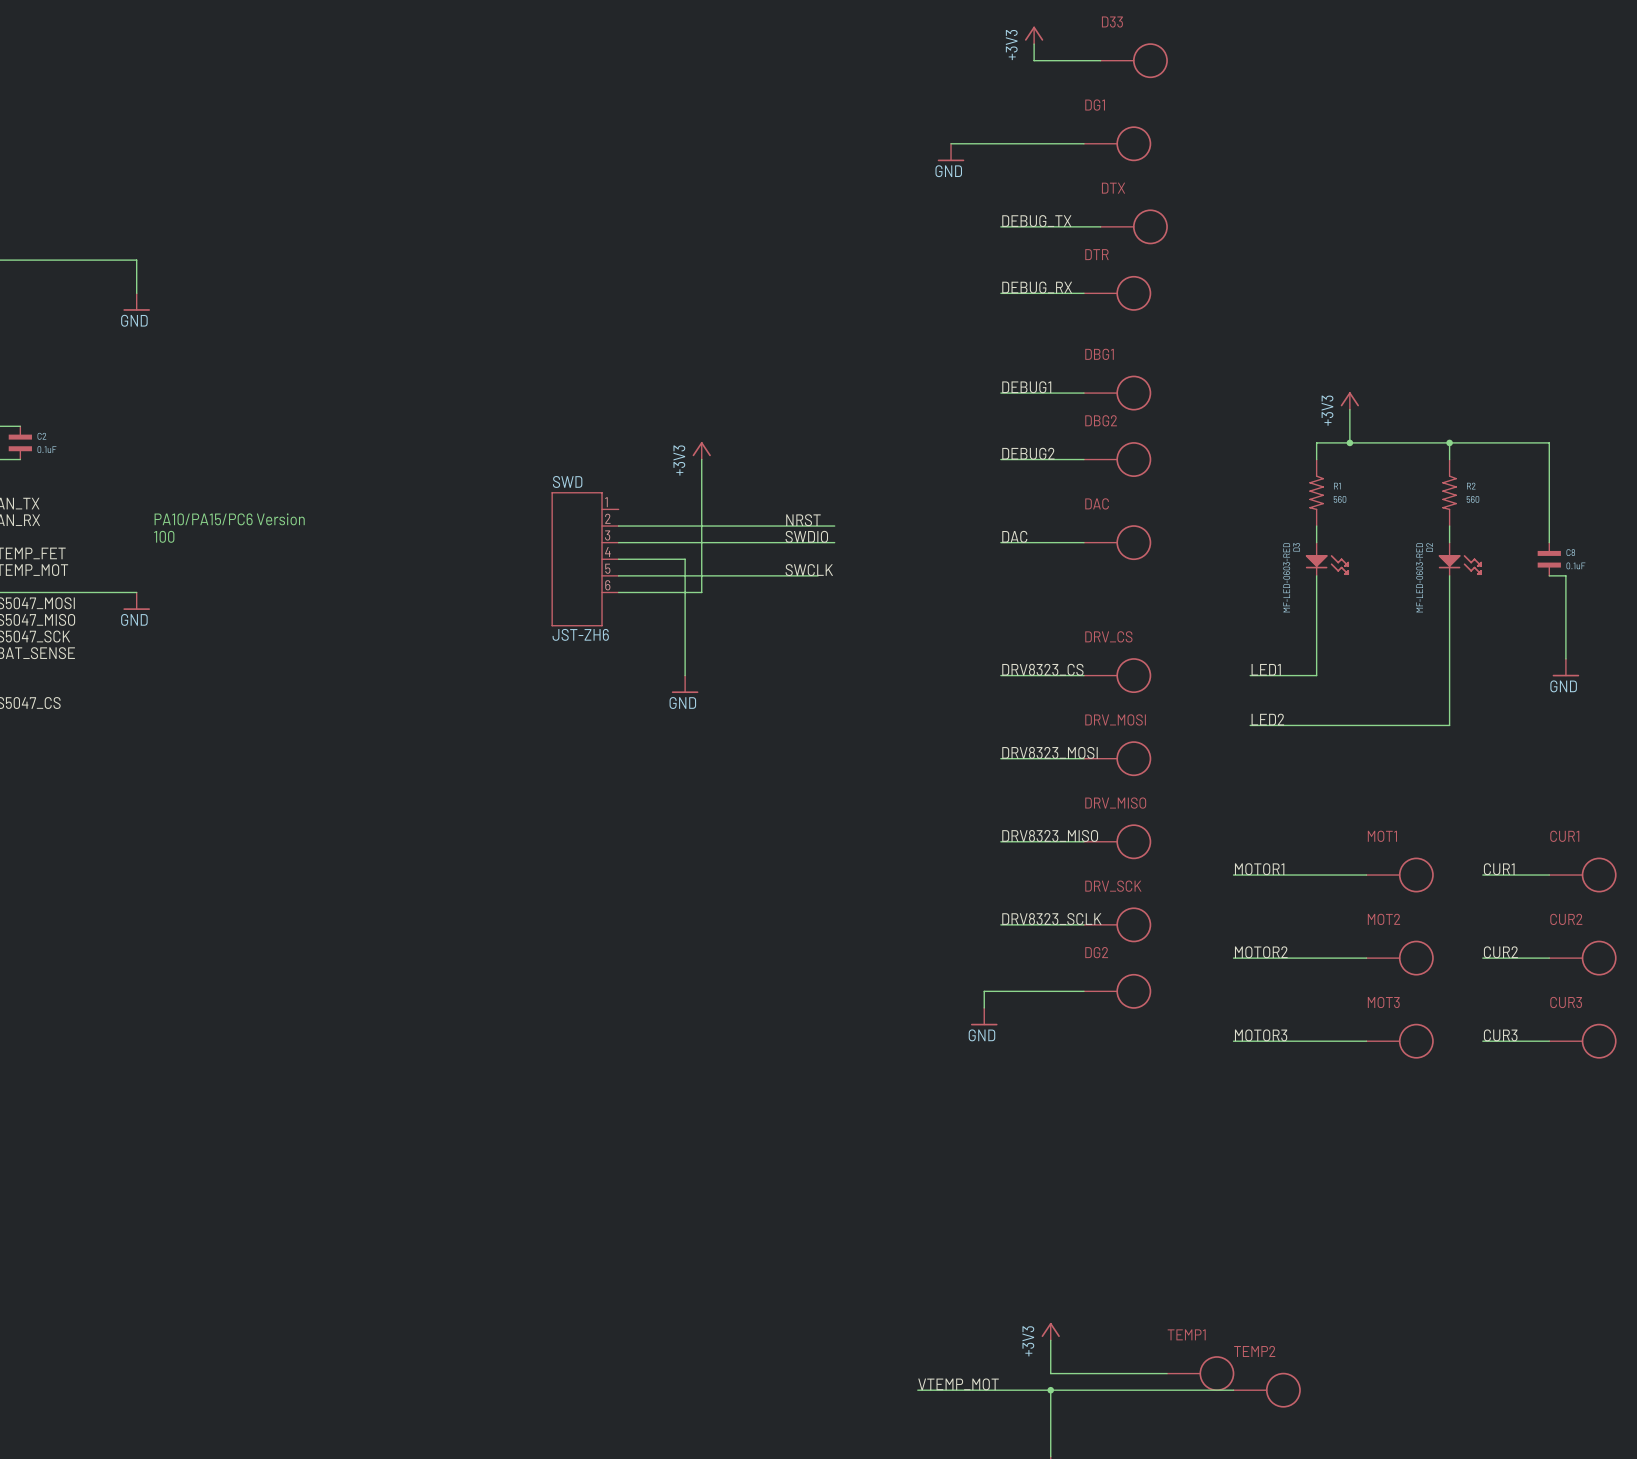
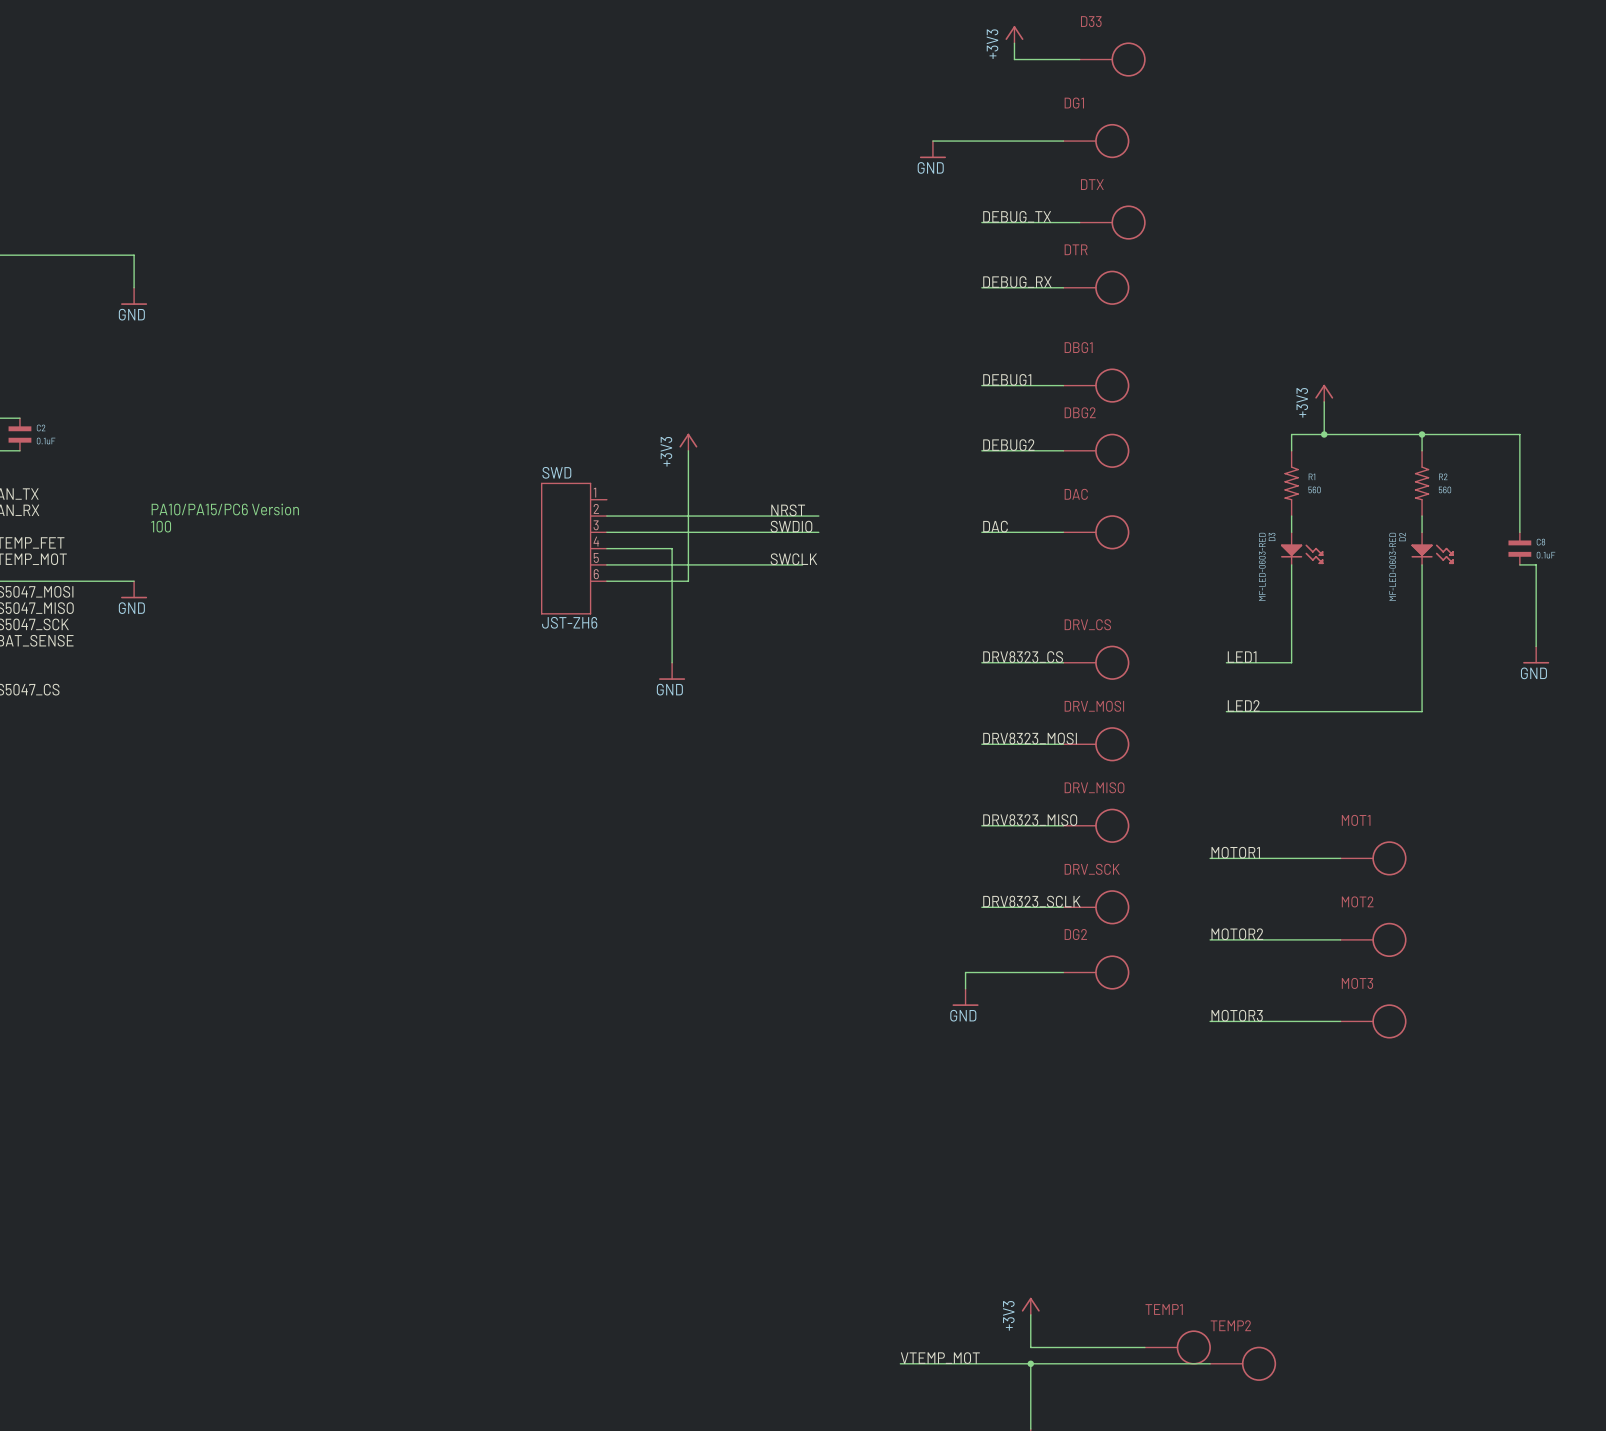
label: CUR1 (1499, 869) -> none
wire: (1482, 875) (1549, 875) -> none
CUR1: (1582, 875) -> none
label: CUR2 (1500, 952) -> none
wire: (1482, 958) (1549, 958) -> none
CUR2: (1582, 958) -> none
label: CUR3 (1500, 1035) -> none
wire: (1482, 1041) (1549, 1041) -> none
CUR3: (1582, 1041) -> none

